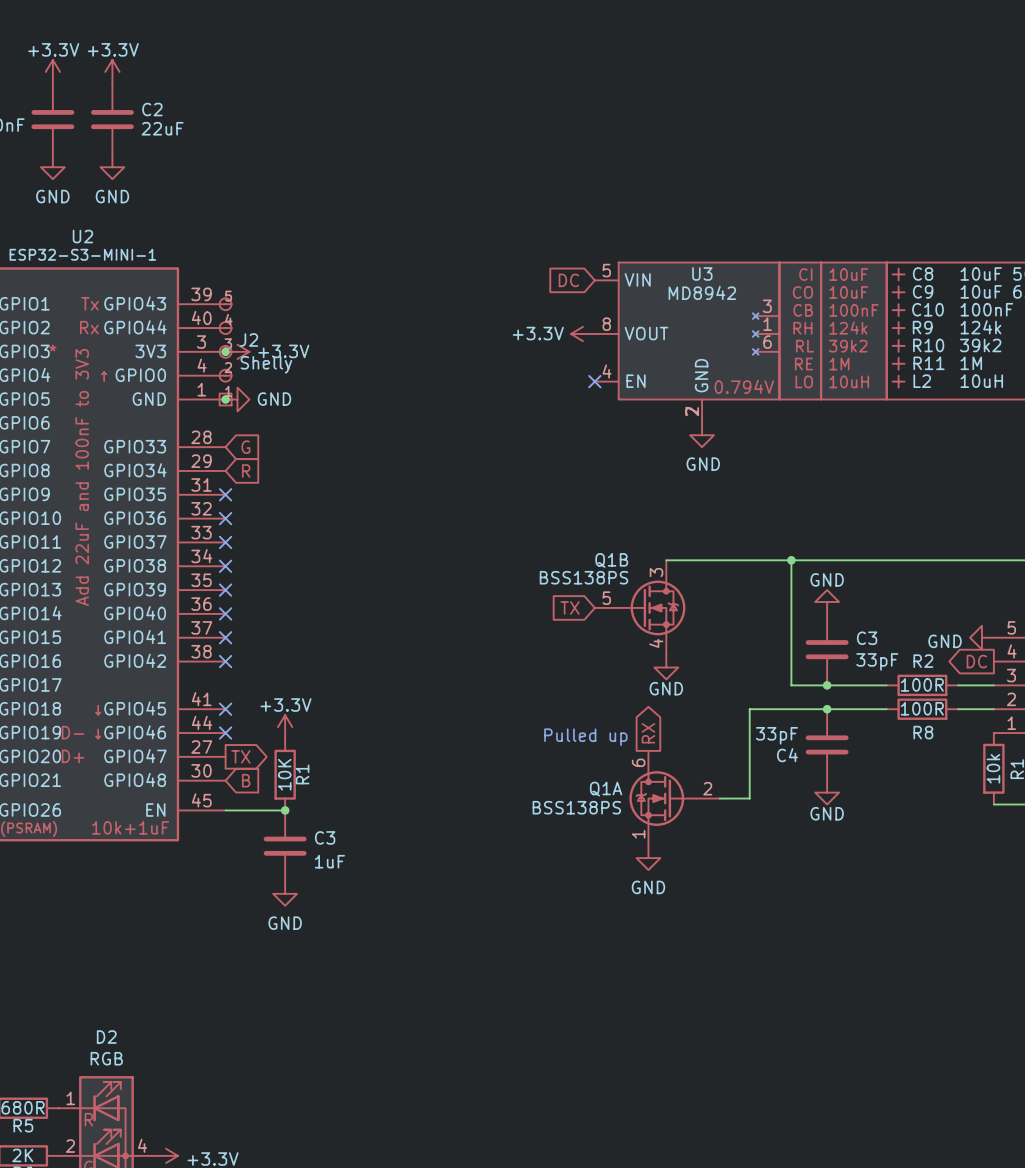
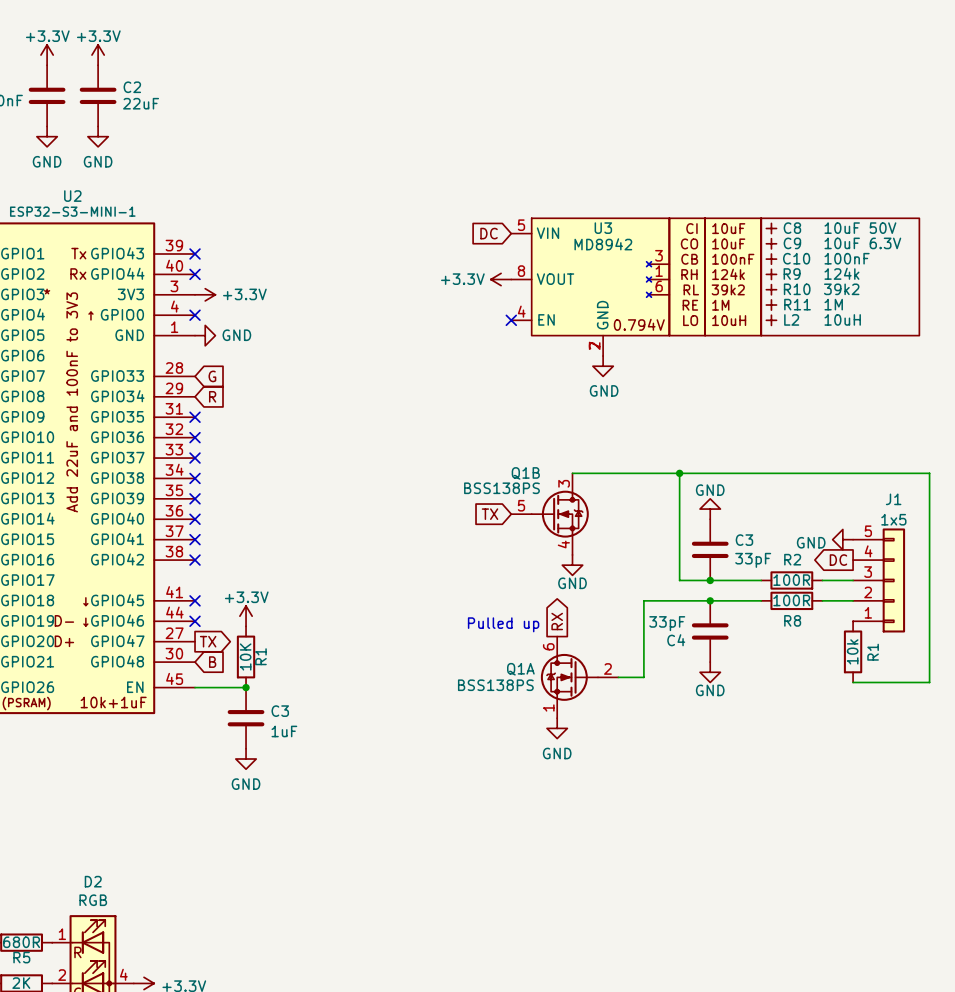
no-connect mark: none -> (195, 254)
no-connect mark: none -> (195, 274)
junction: (225, 351) -> none
J2: Shelly (225, 351) -> none
no-connect mark: none -> (195, 315)
junction: (225, 399) -> none

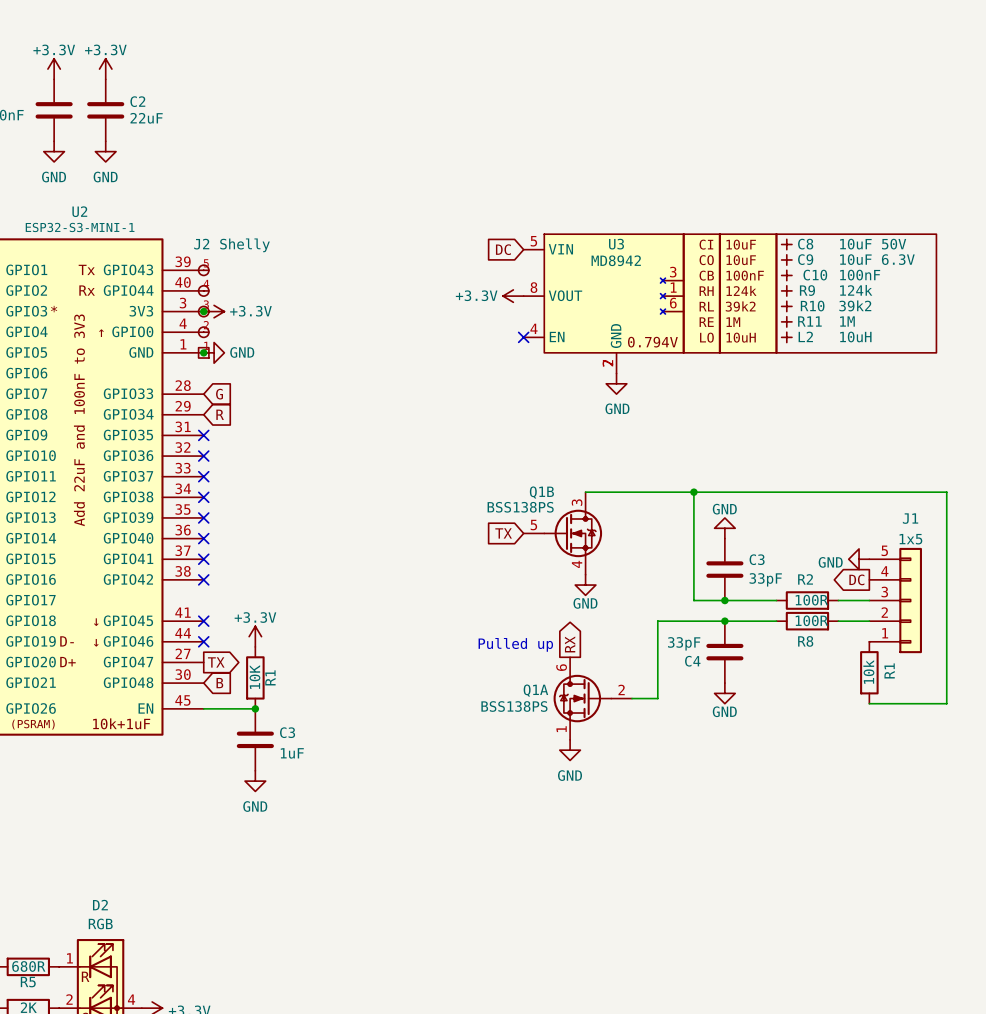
no-connect mark: (195, 254) -> none
no-connect mark: (195, 274) -> none
junction: none -> (203, 311)
J2: none -> Shelly (203, 311)
no-connect mark: (195, 315) -> none
junction: none -> (203, 352)

